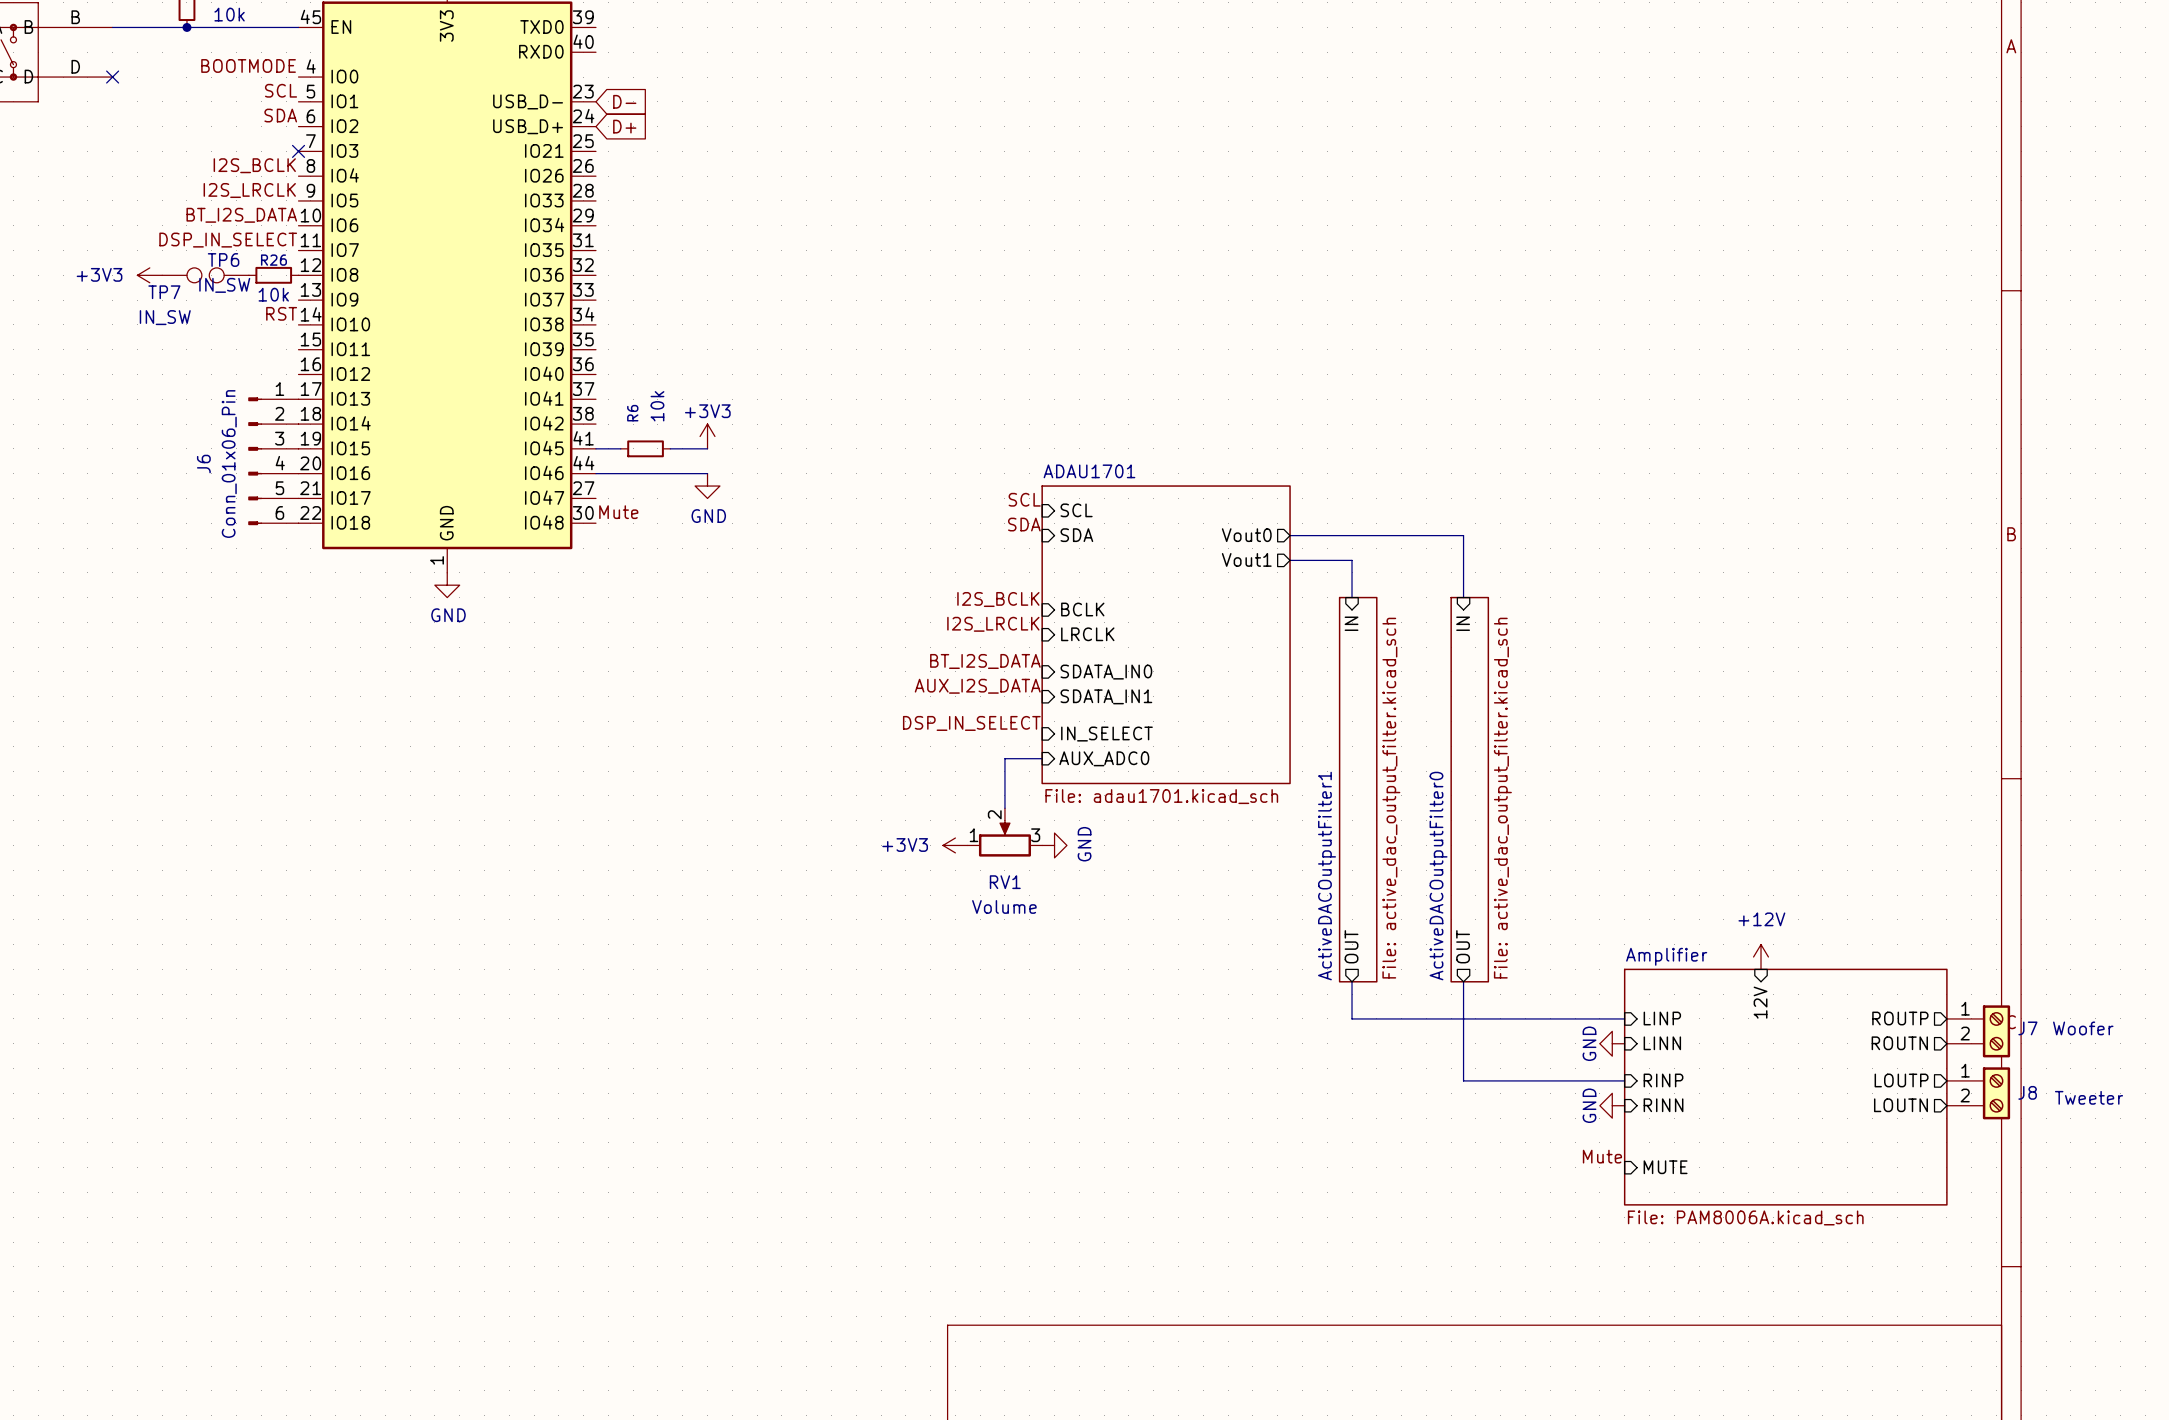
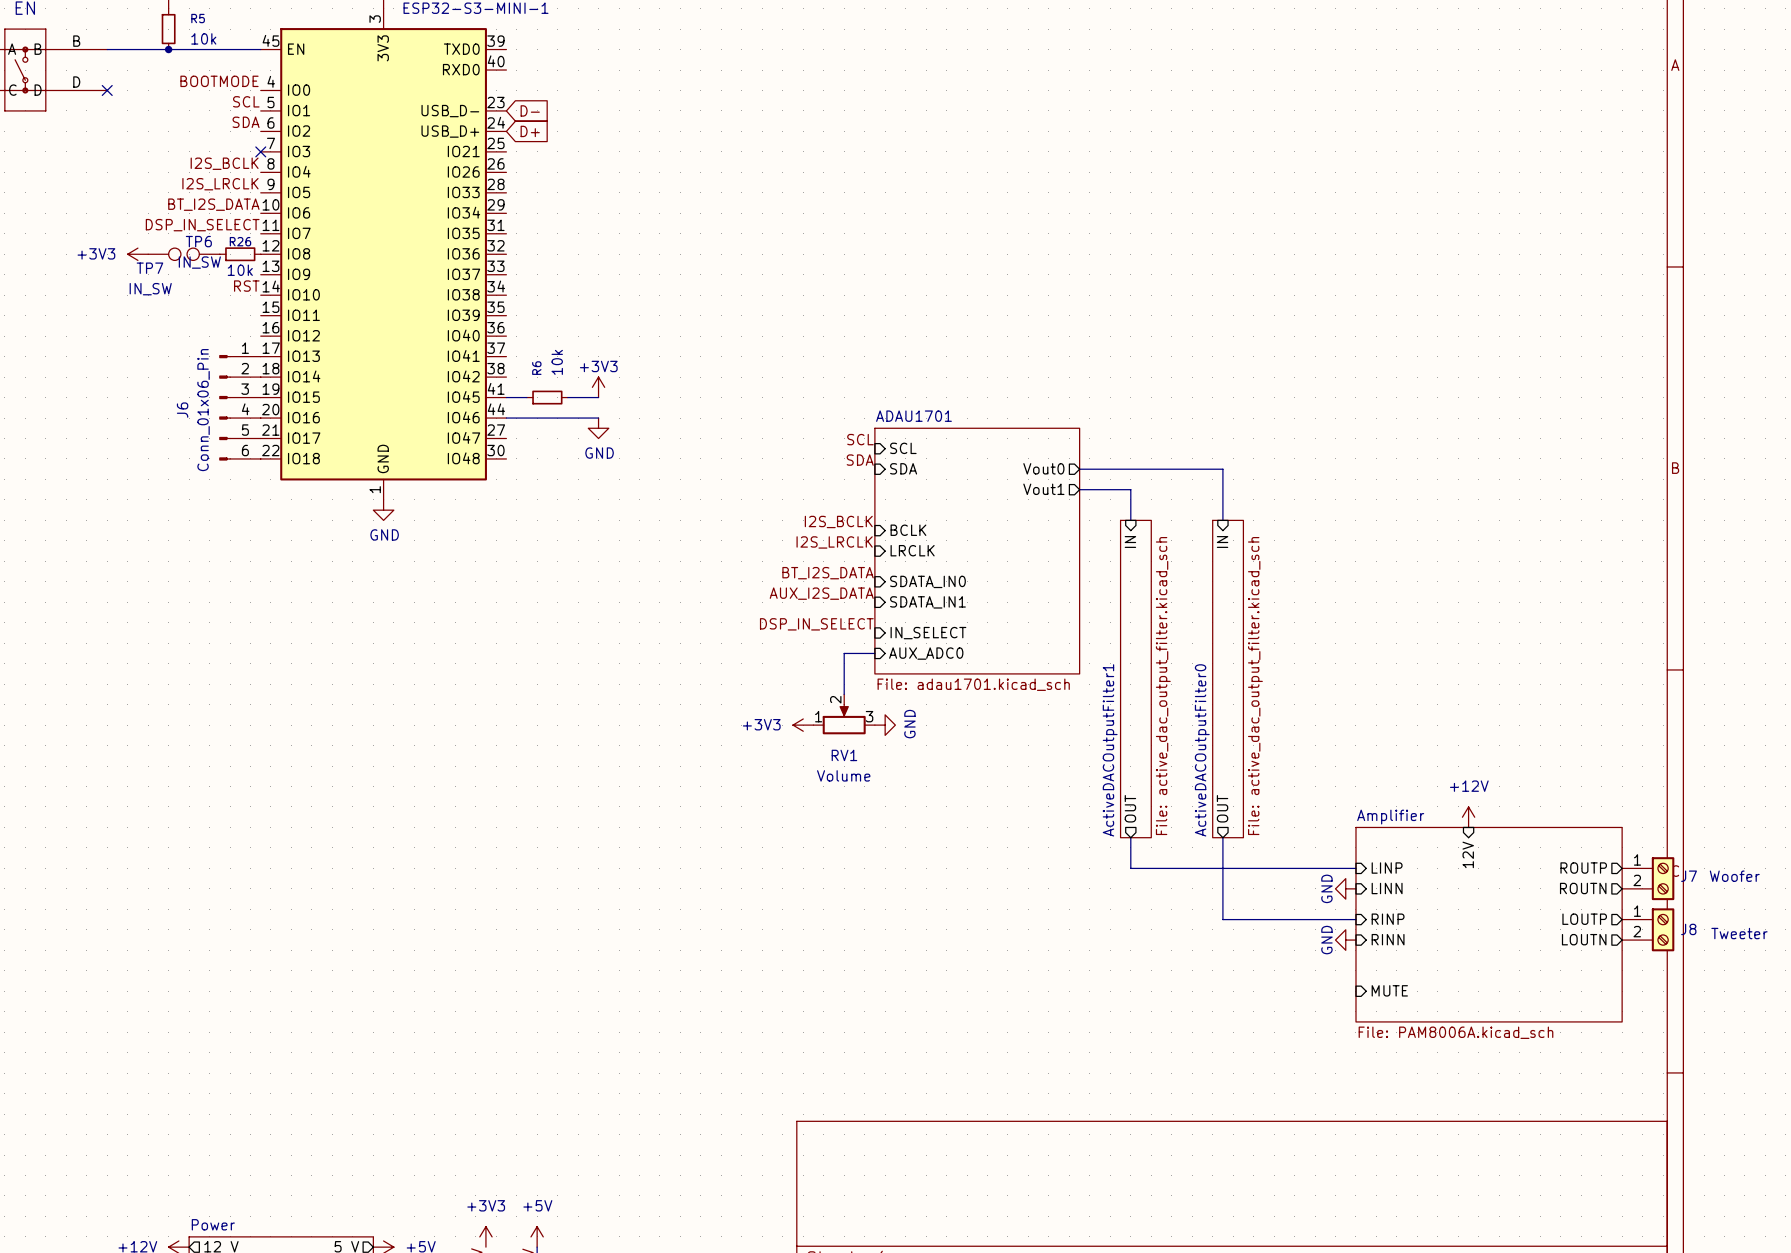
label: Mute (618, 512) -> none
label: Mute (1602, 1156) -> none

